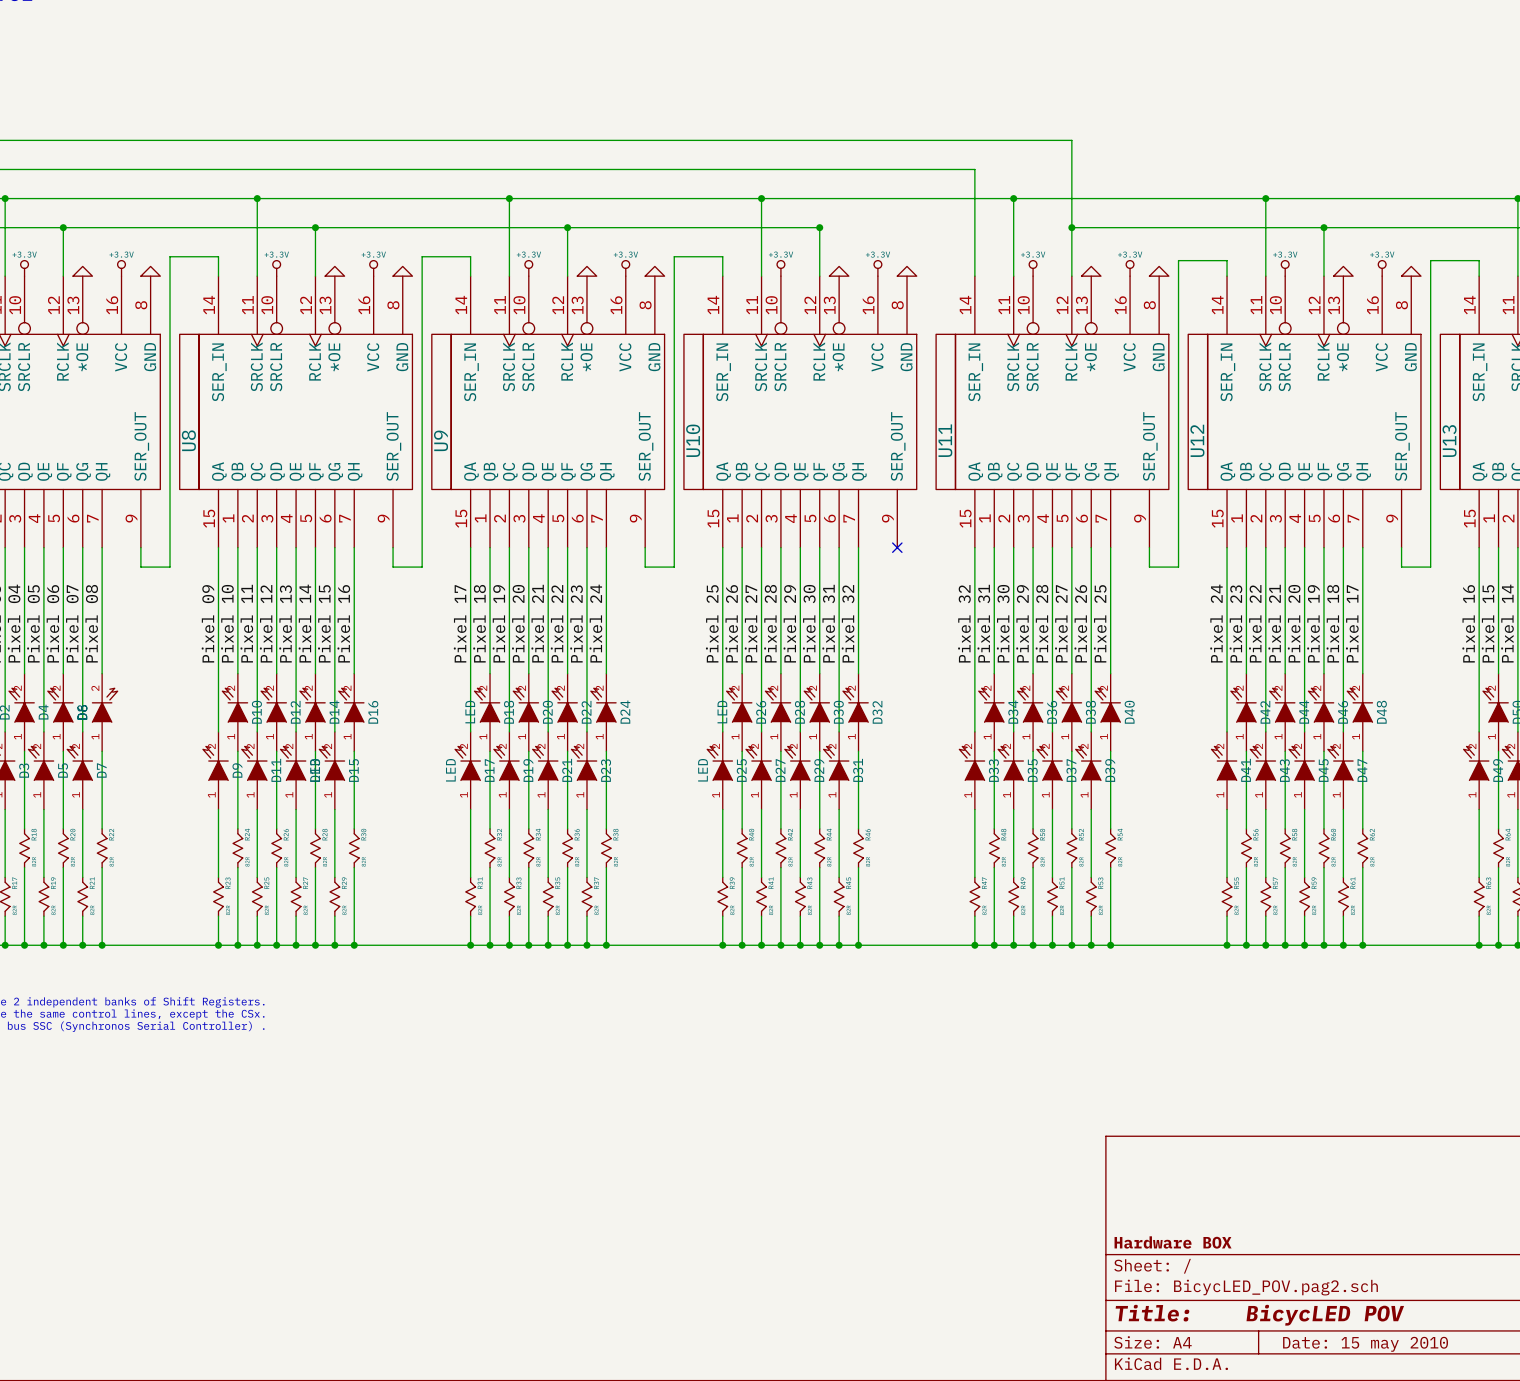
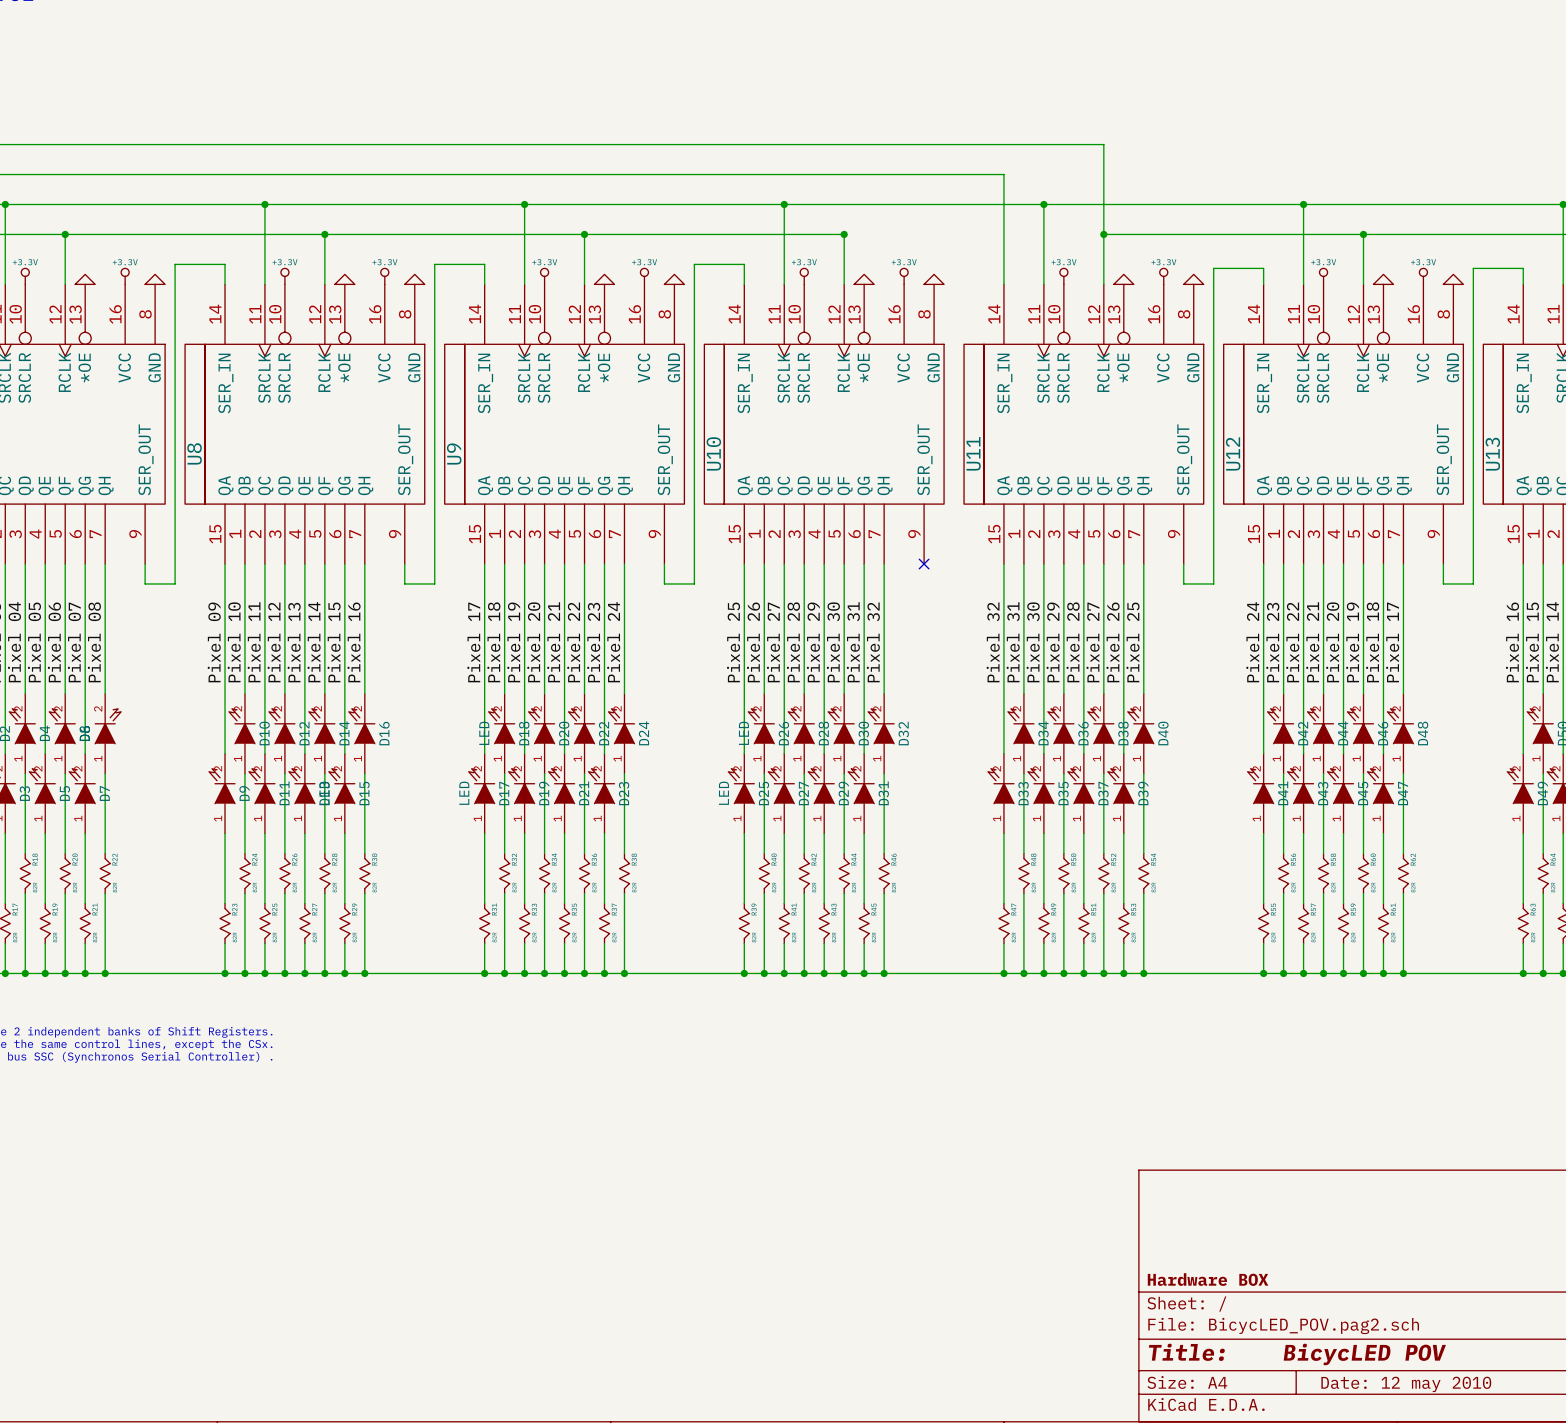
title block: Date: 15 may 2010 (1365, 1344) -> Date: 12 may 2010 (1406, 1384)

